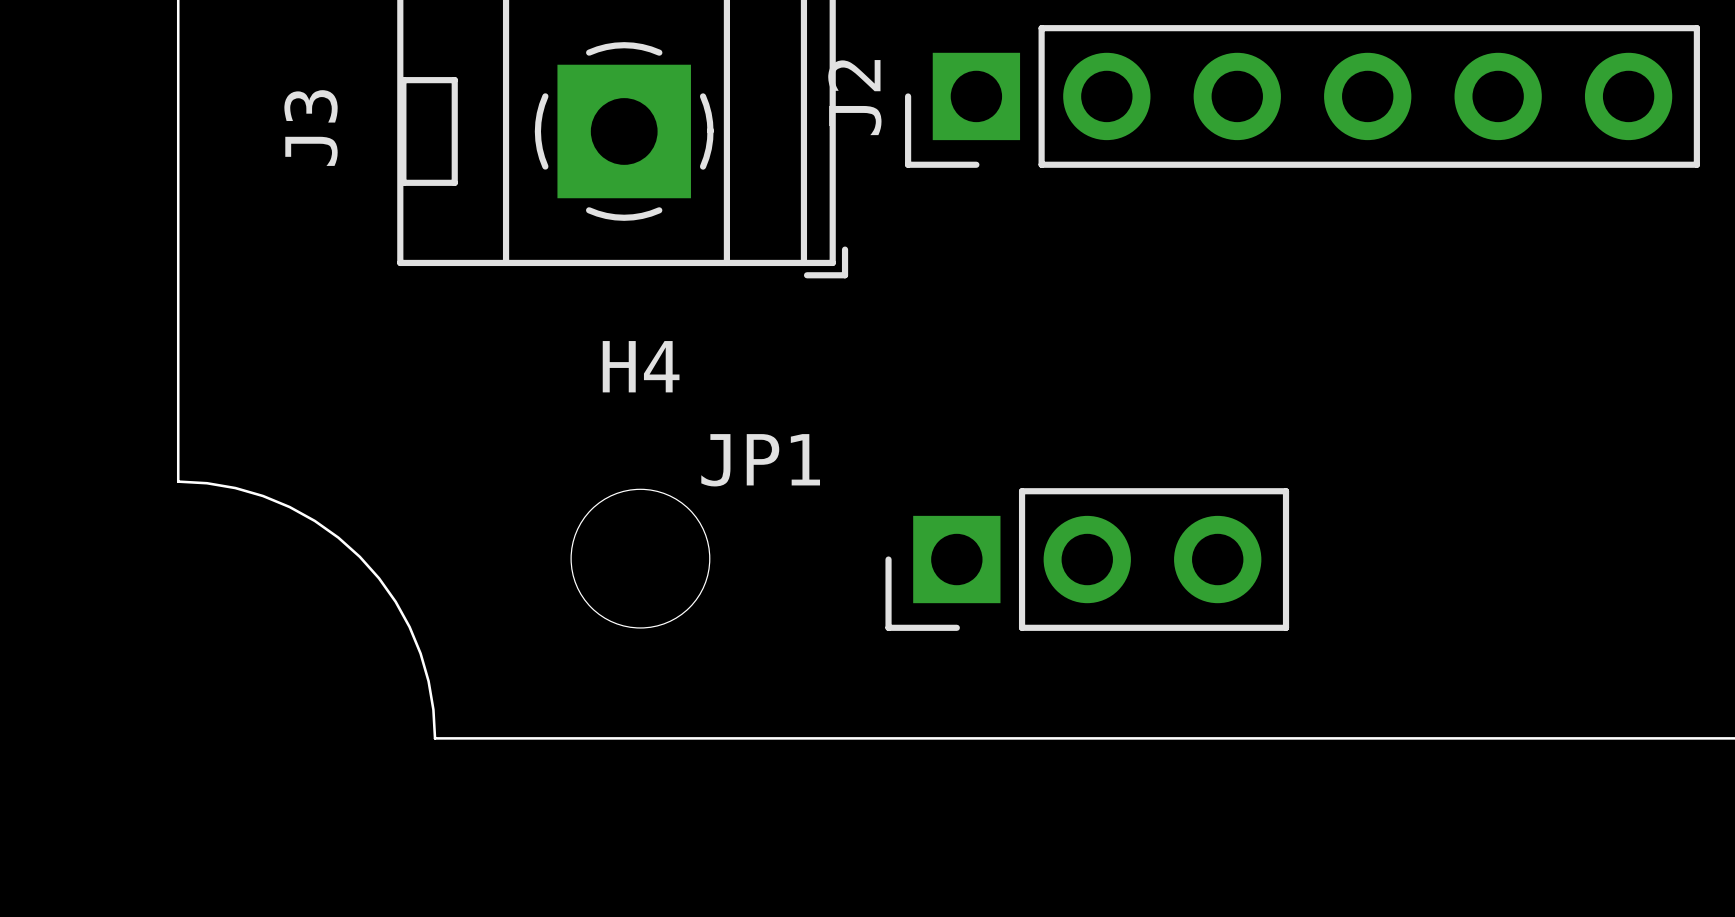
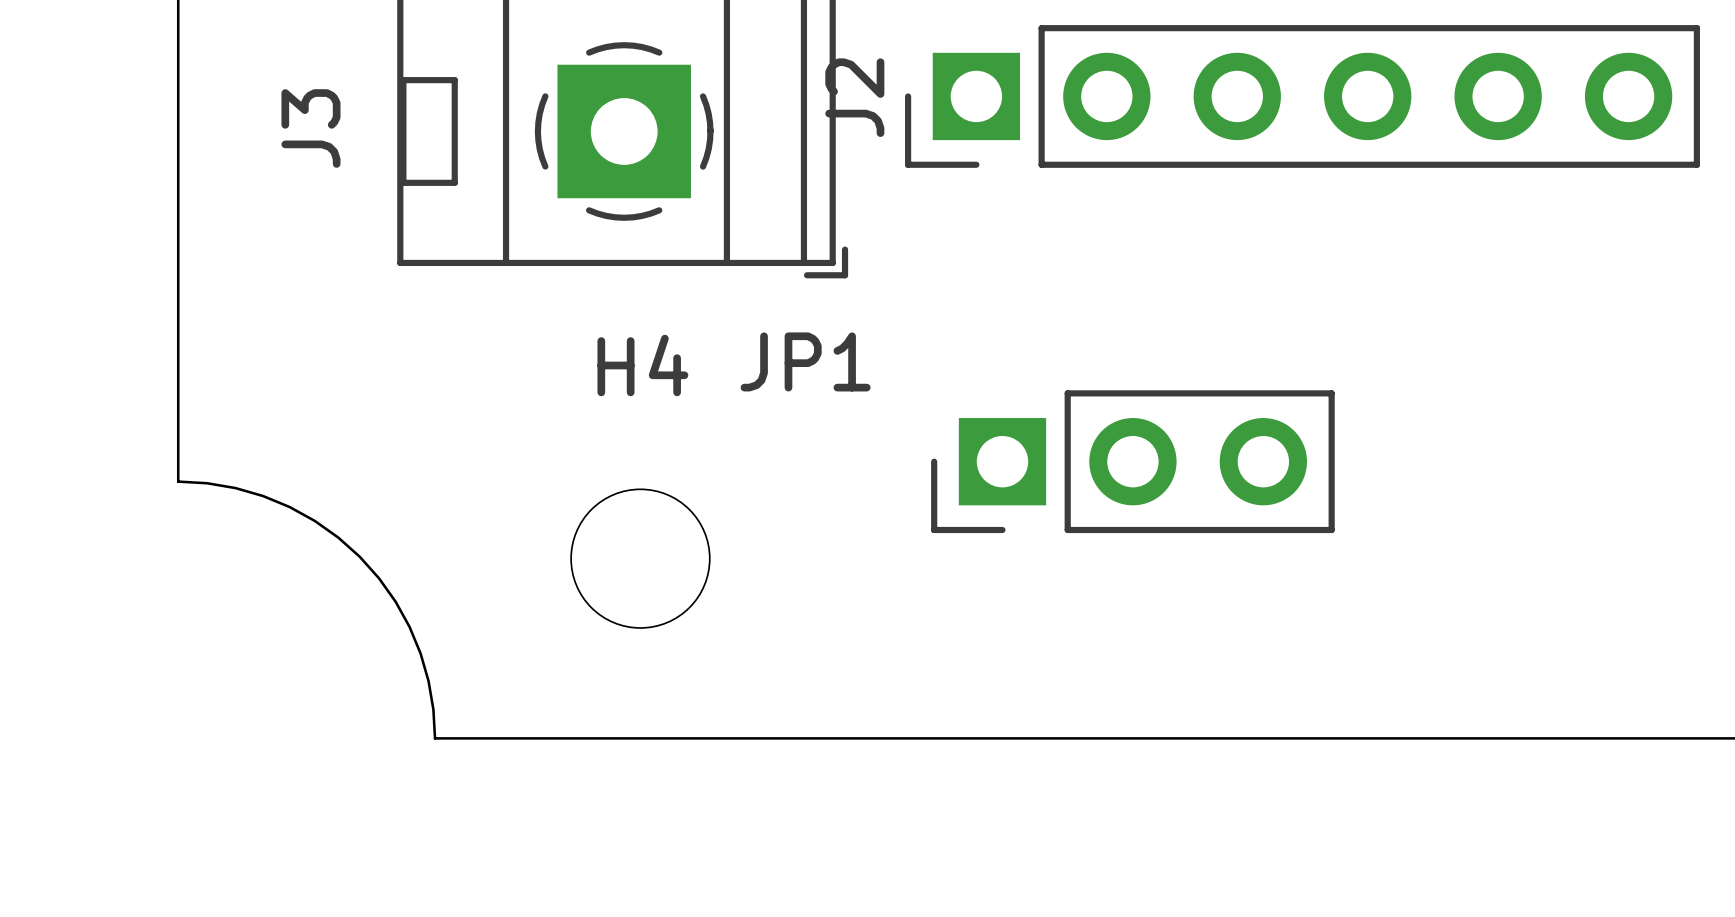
JP1 position: (1087, 559) -> (1132, 461)

